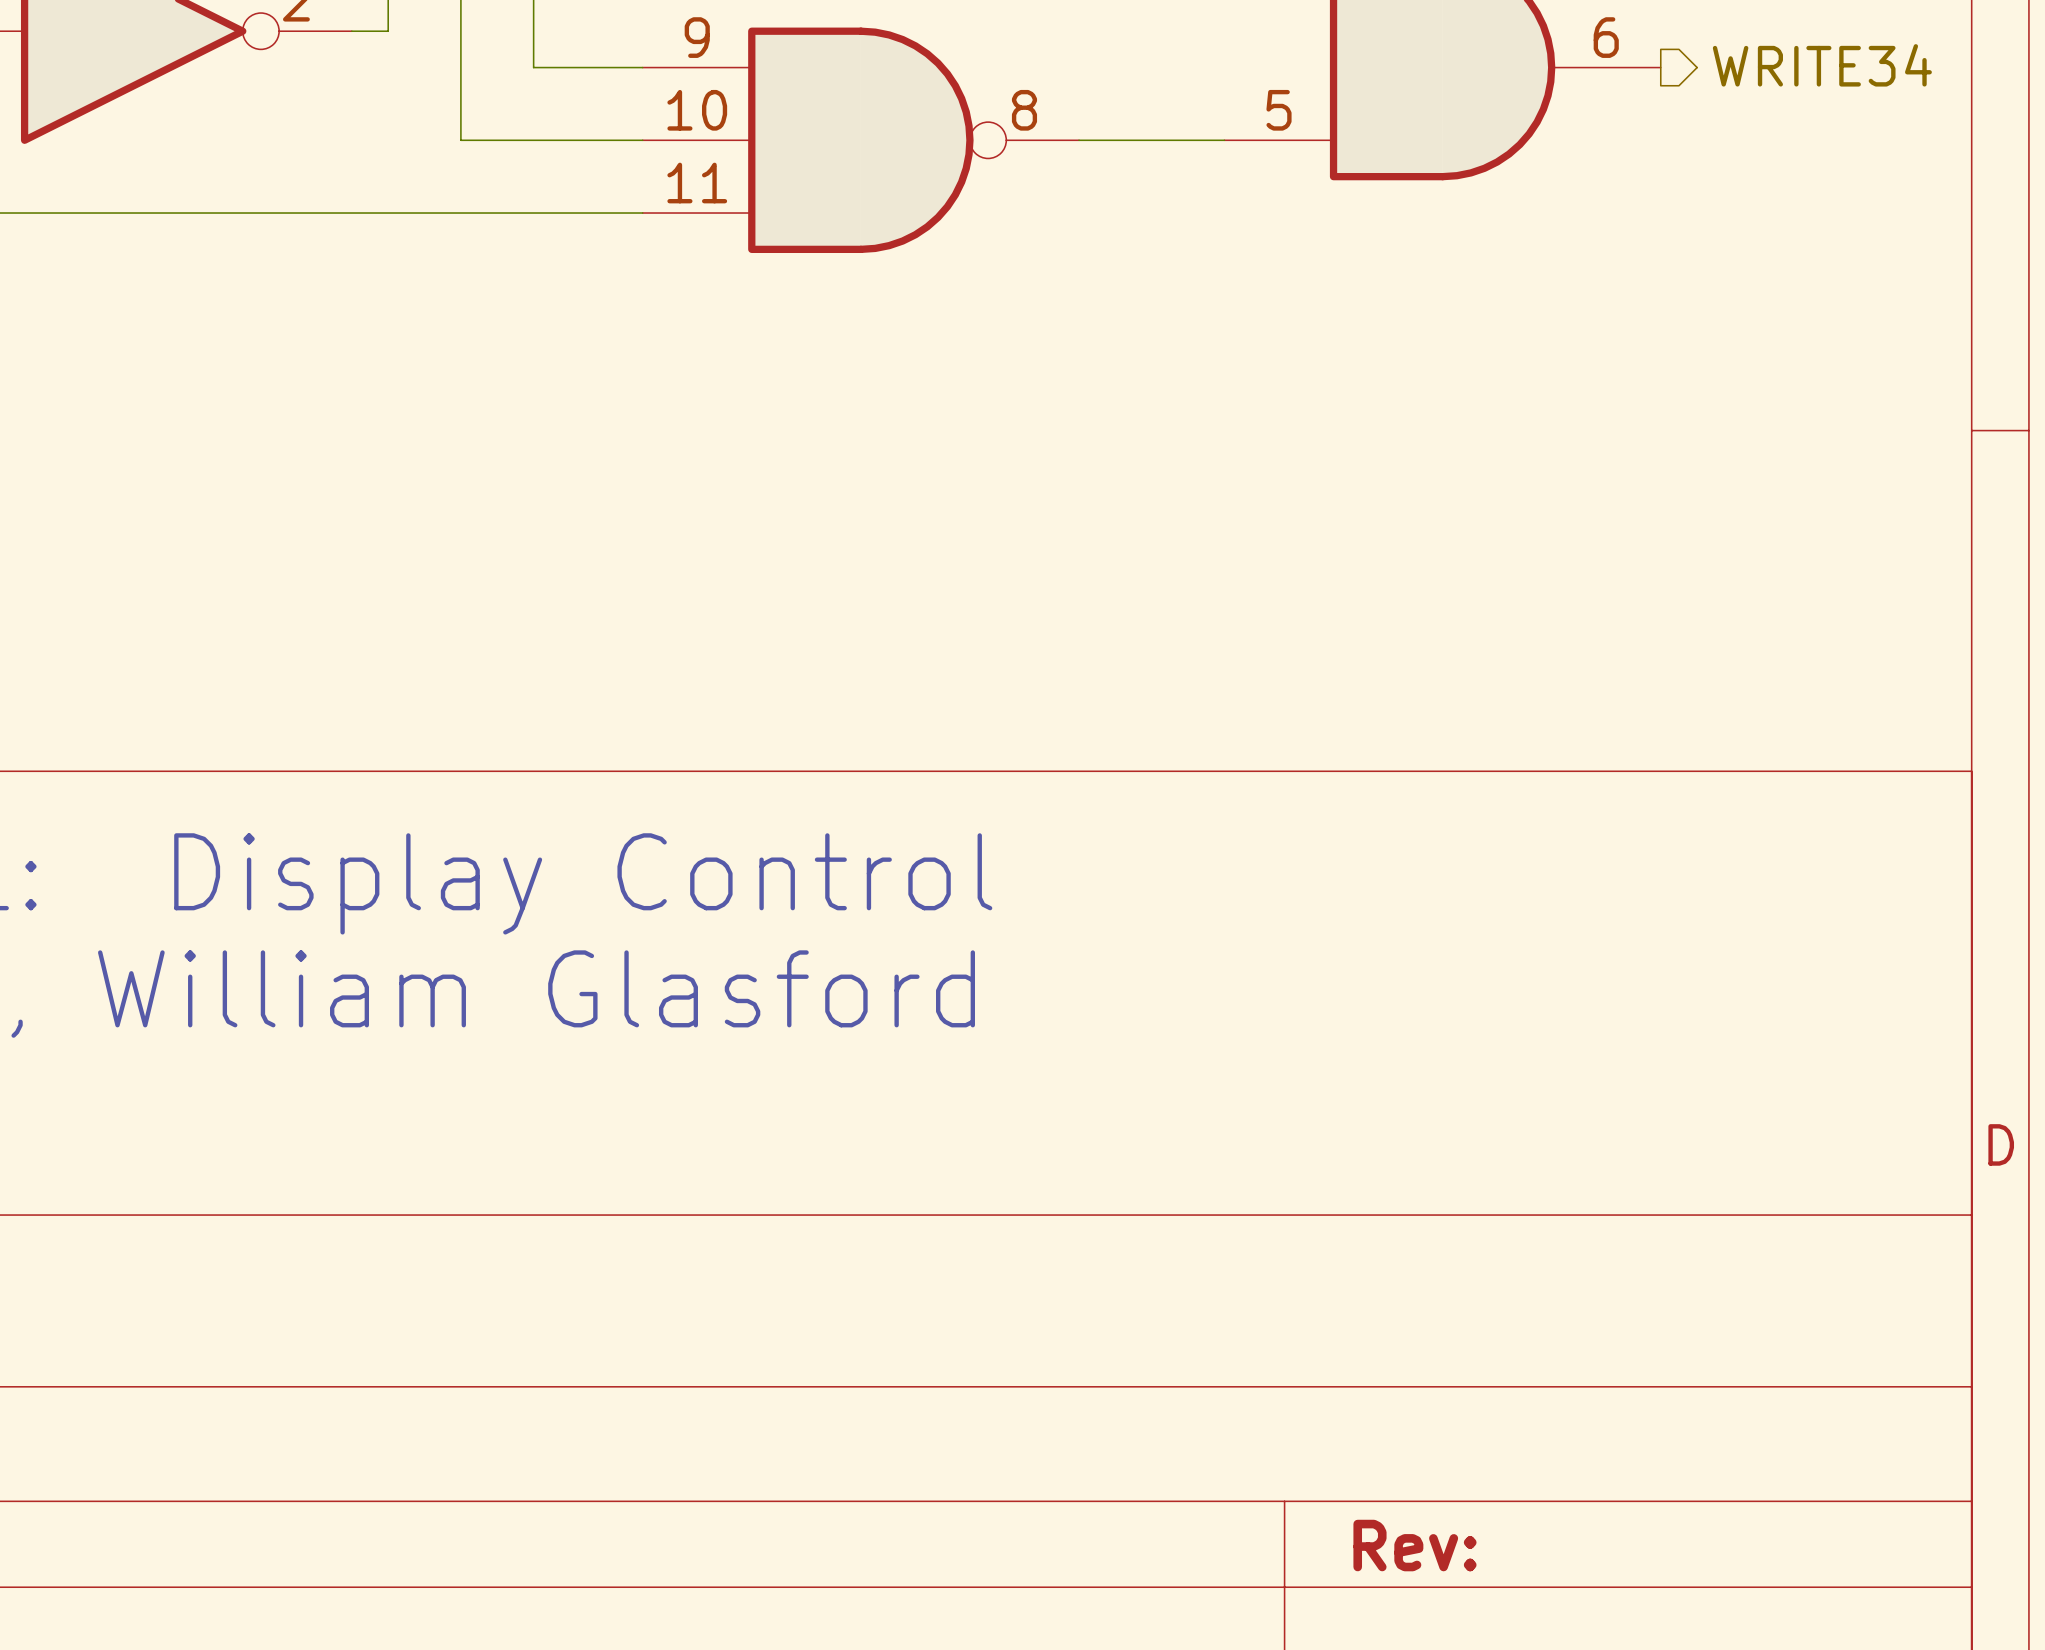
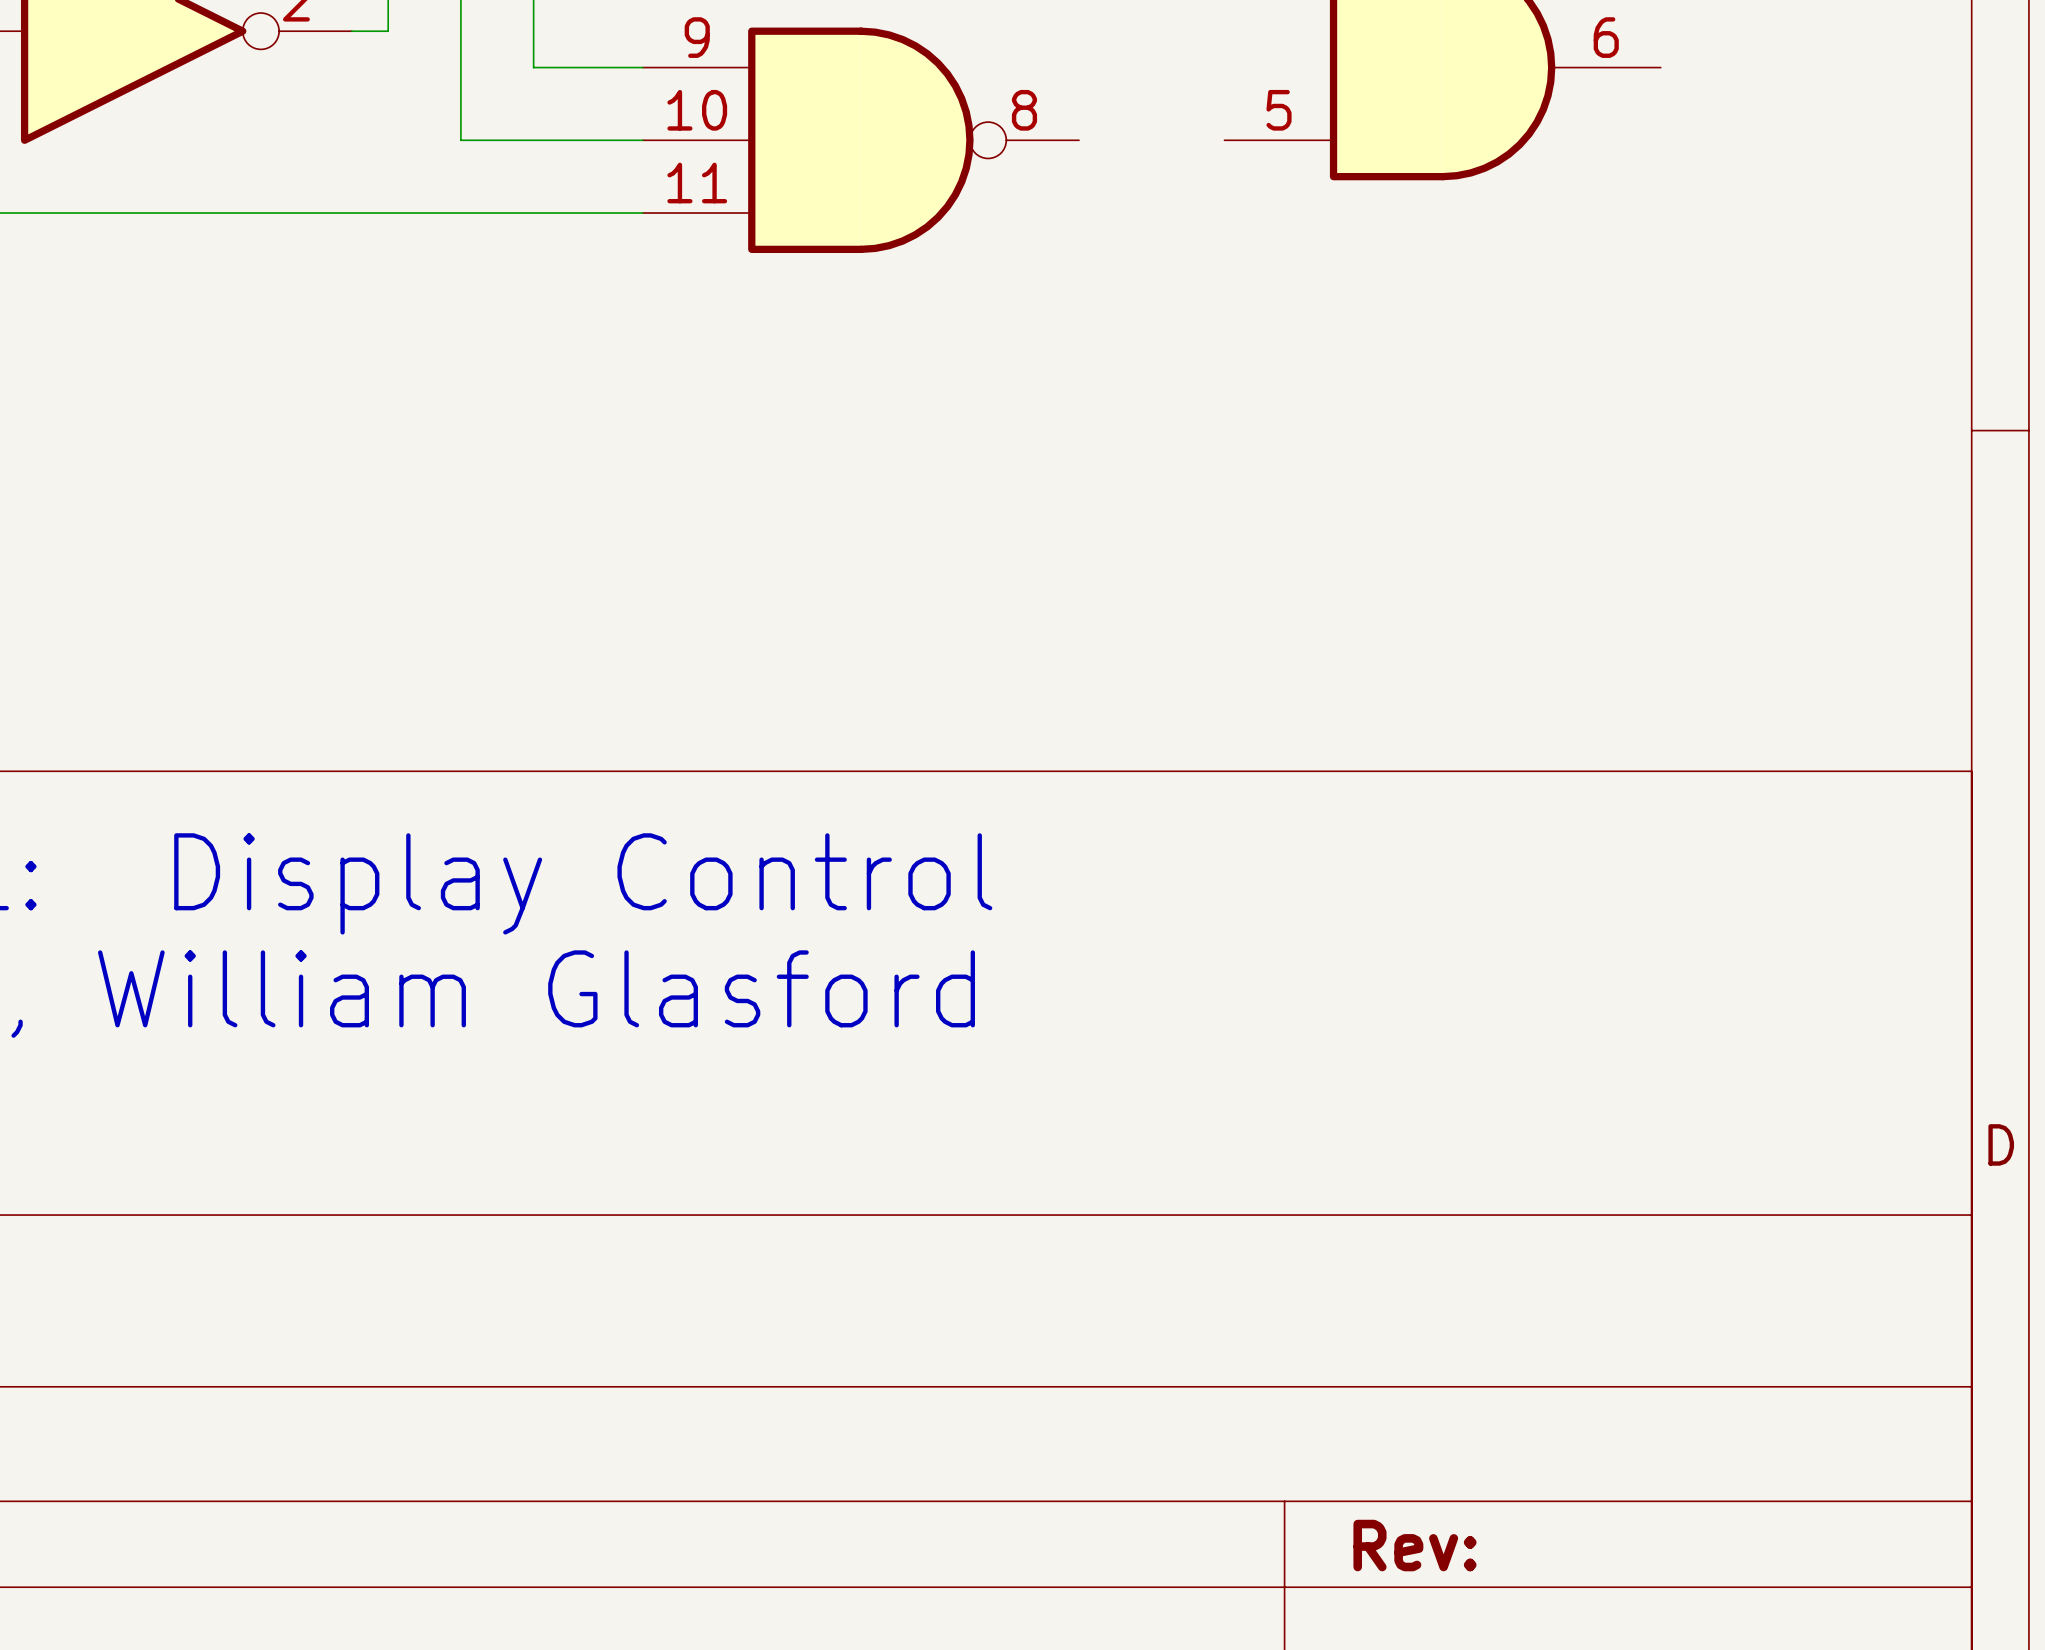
hierarchical label: WRITE34 (1822, 65) -> none
wire: (1079, 140) (1224, 140) -> none

